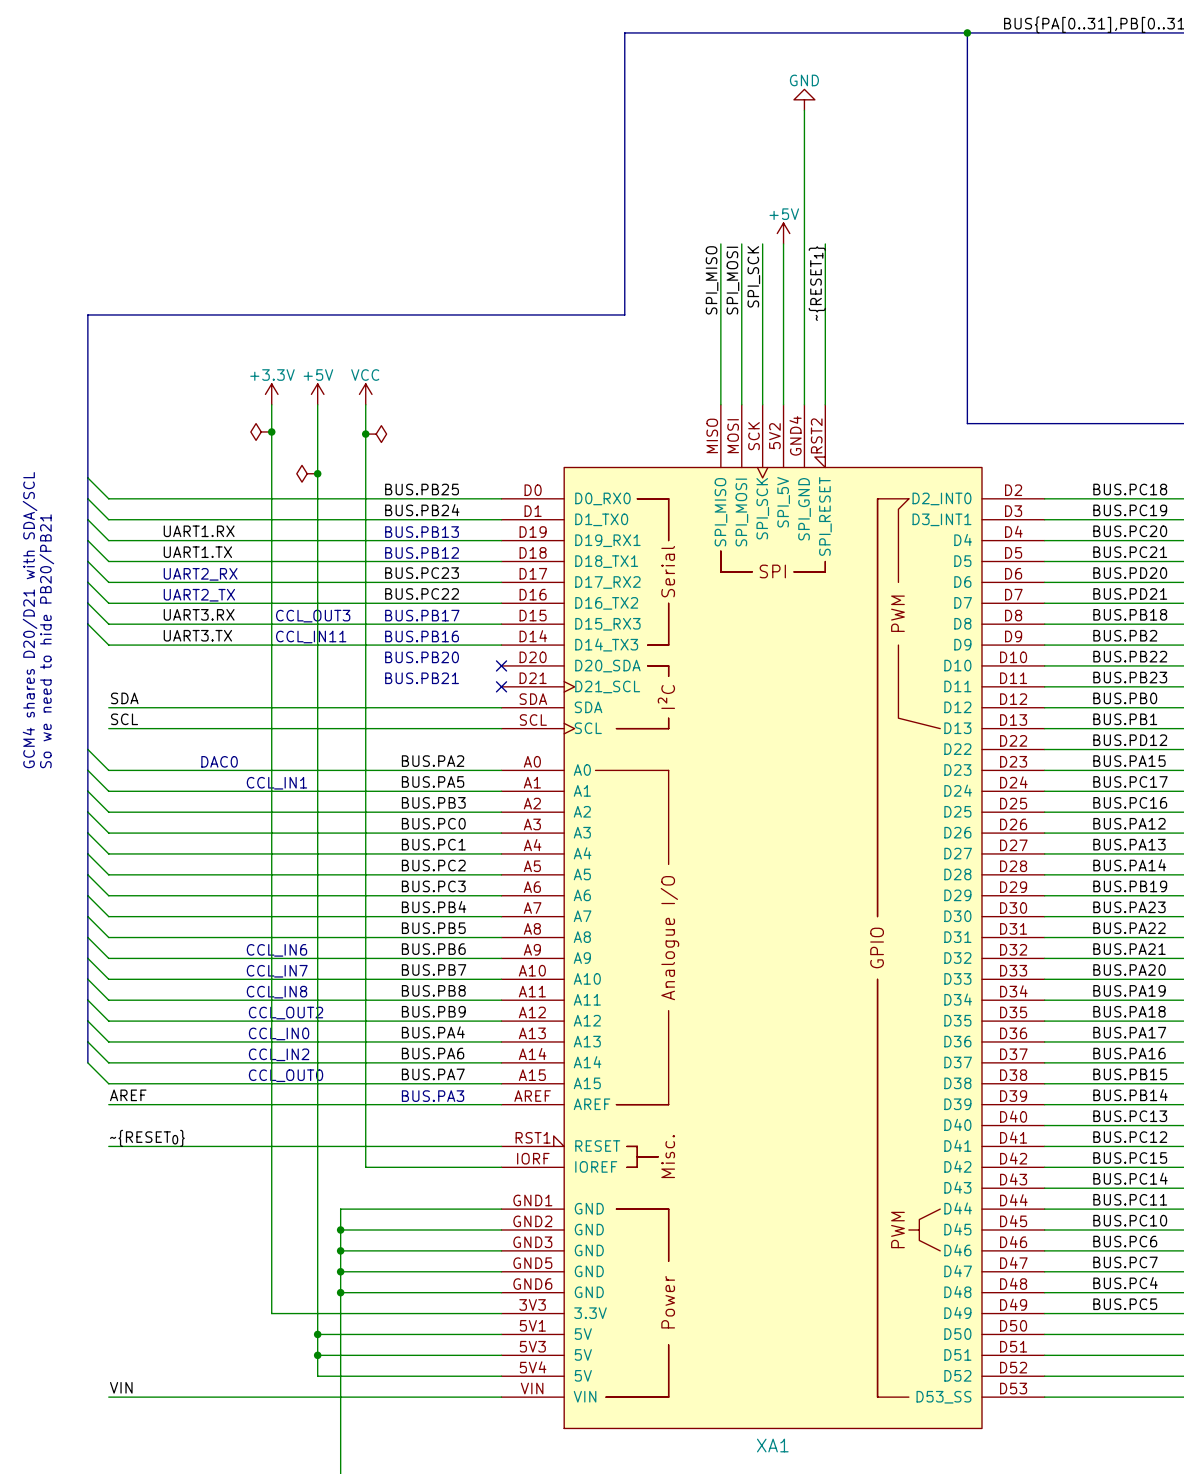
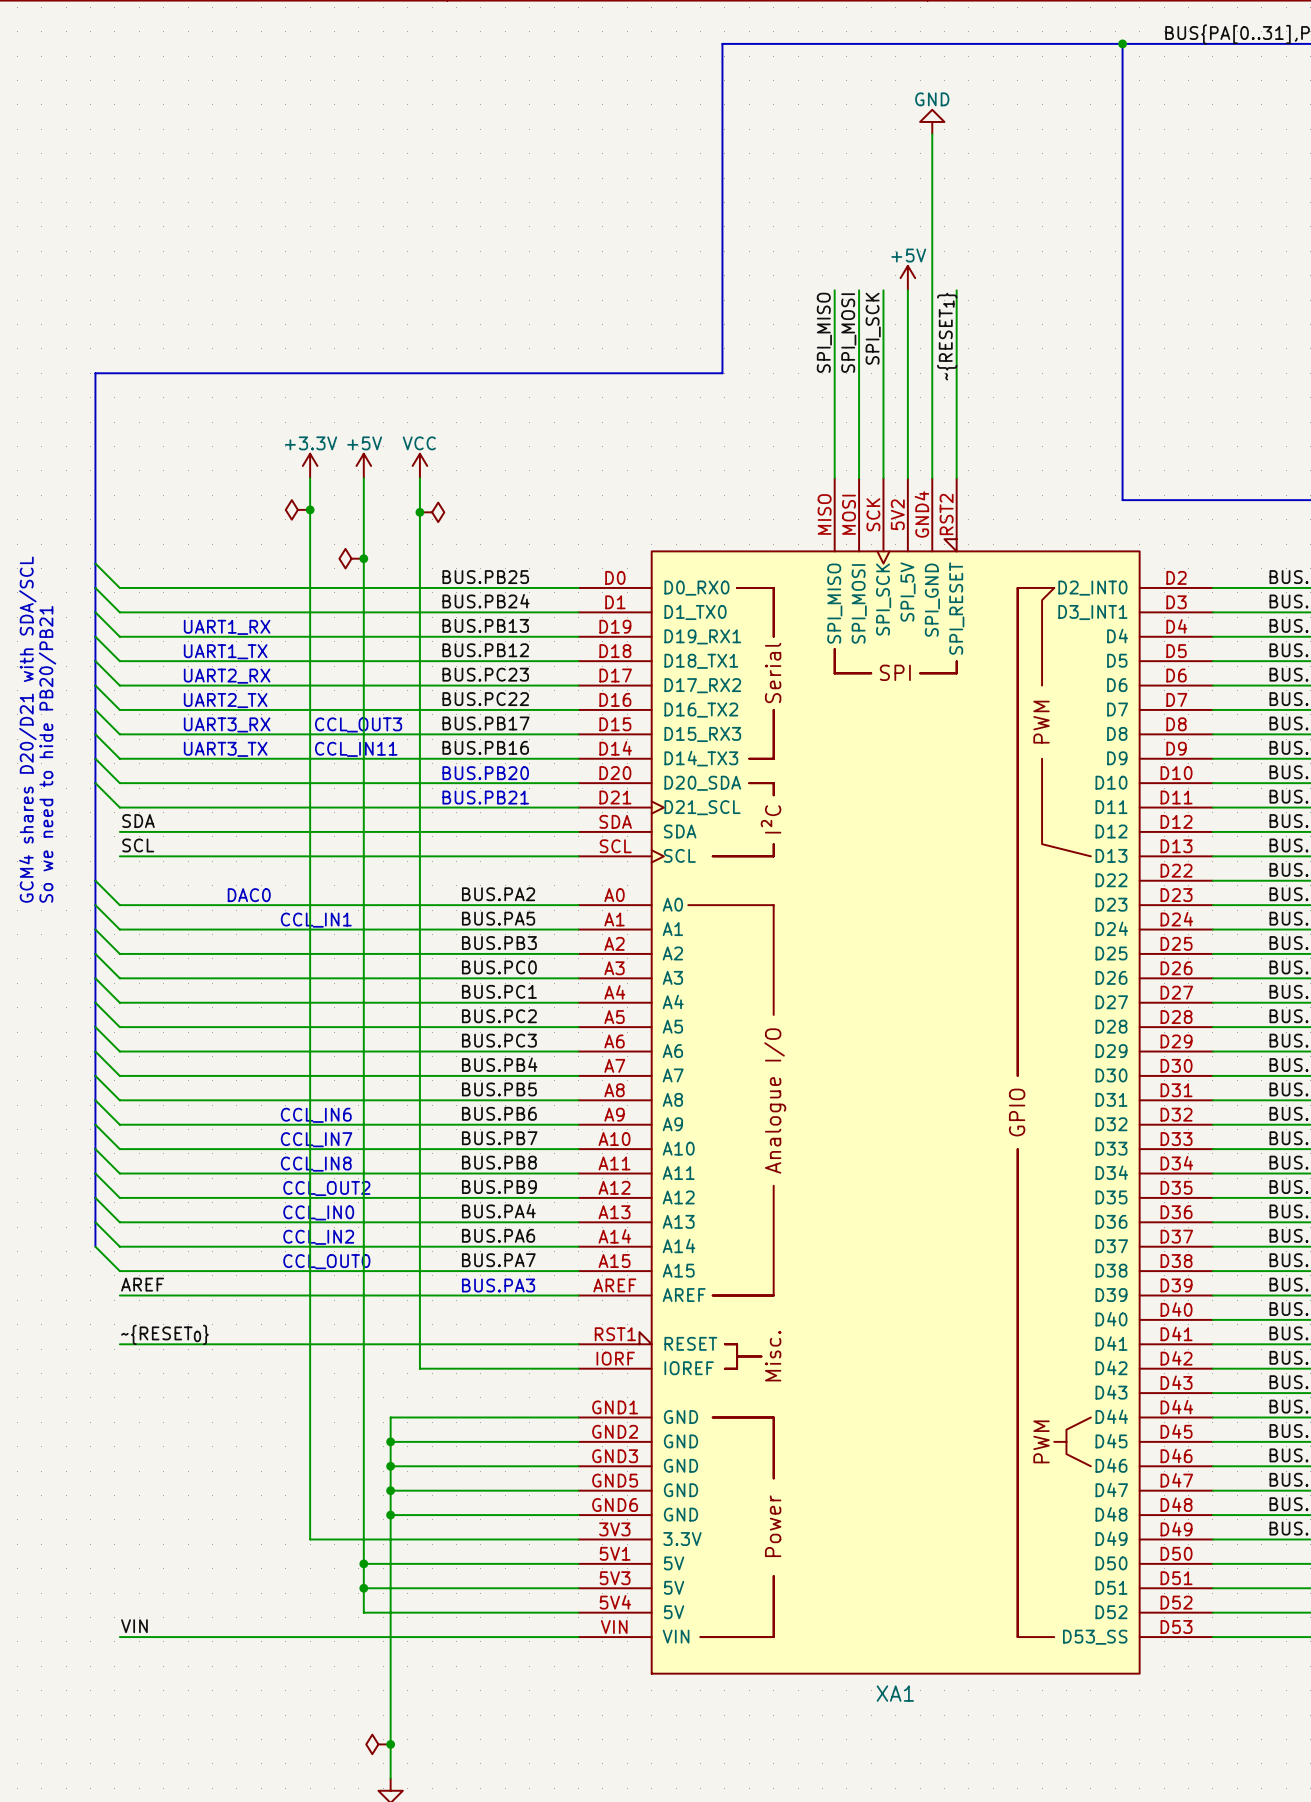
label: UART1.RX (199, 531) -> none
label: none -> BUS.PB13 (485, 625)
text: none -> UART1_RX (227, 627)
text: BUS.PB13 (422, 532) -> none
label: UART1.TX (197, 552) -> none
text: BUS.PB12 (422, 552) -> none
label: none -> BUS.PB12 (485, 650)
text: none -> UART1_TX (225, 651)
label: UART3.RX (199, 614) -> none
label: none -> BUS.PB17 (486, 723)
text: BUS.PB17 (422, 615) -> none
text: none -> UART3_RX (227, 724)
label: UART3.TX (197, 635) -> none
label: none -> BUS.PB16 (485, 747)
text: BUS.PB16 (422, 636) -> none
text: none -> UART3_TX (225, 749)
wire: none -> (95, 758) (119, 783) (578, 783)
wire: none -> (95, 783) (119, 807) (578, 807)
no-connect mark: (501, 665) -> none
no-connect mark: (501, 686) -> none

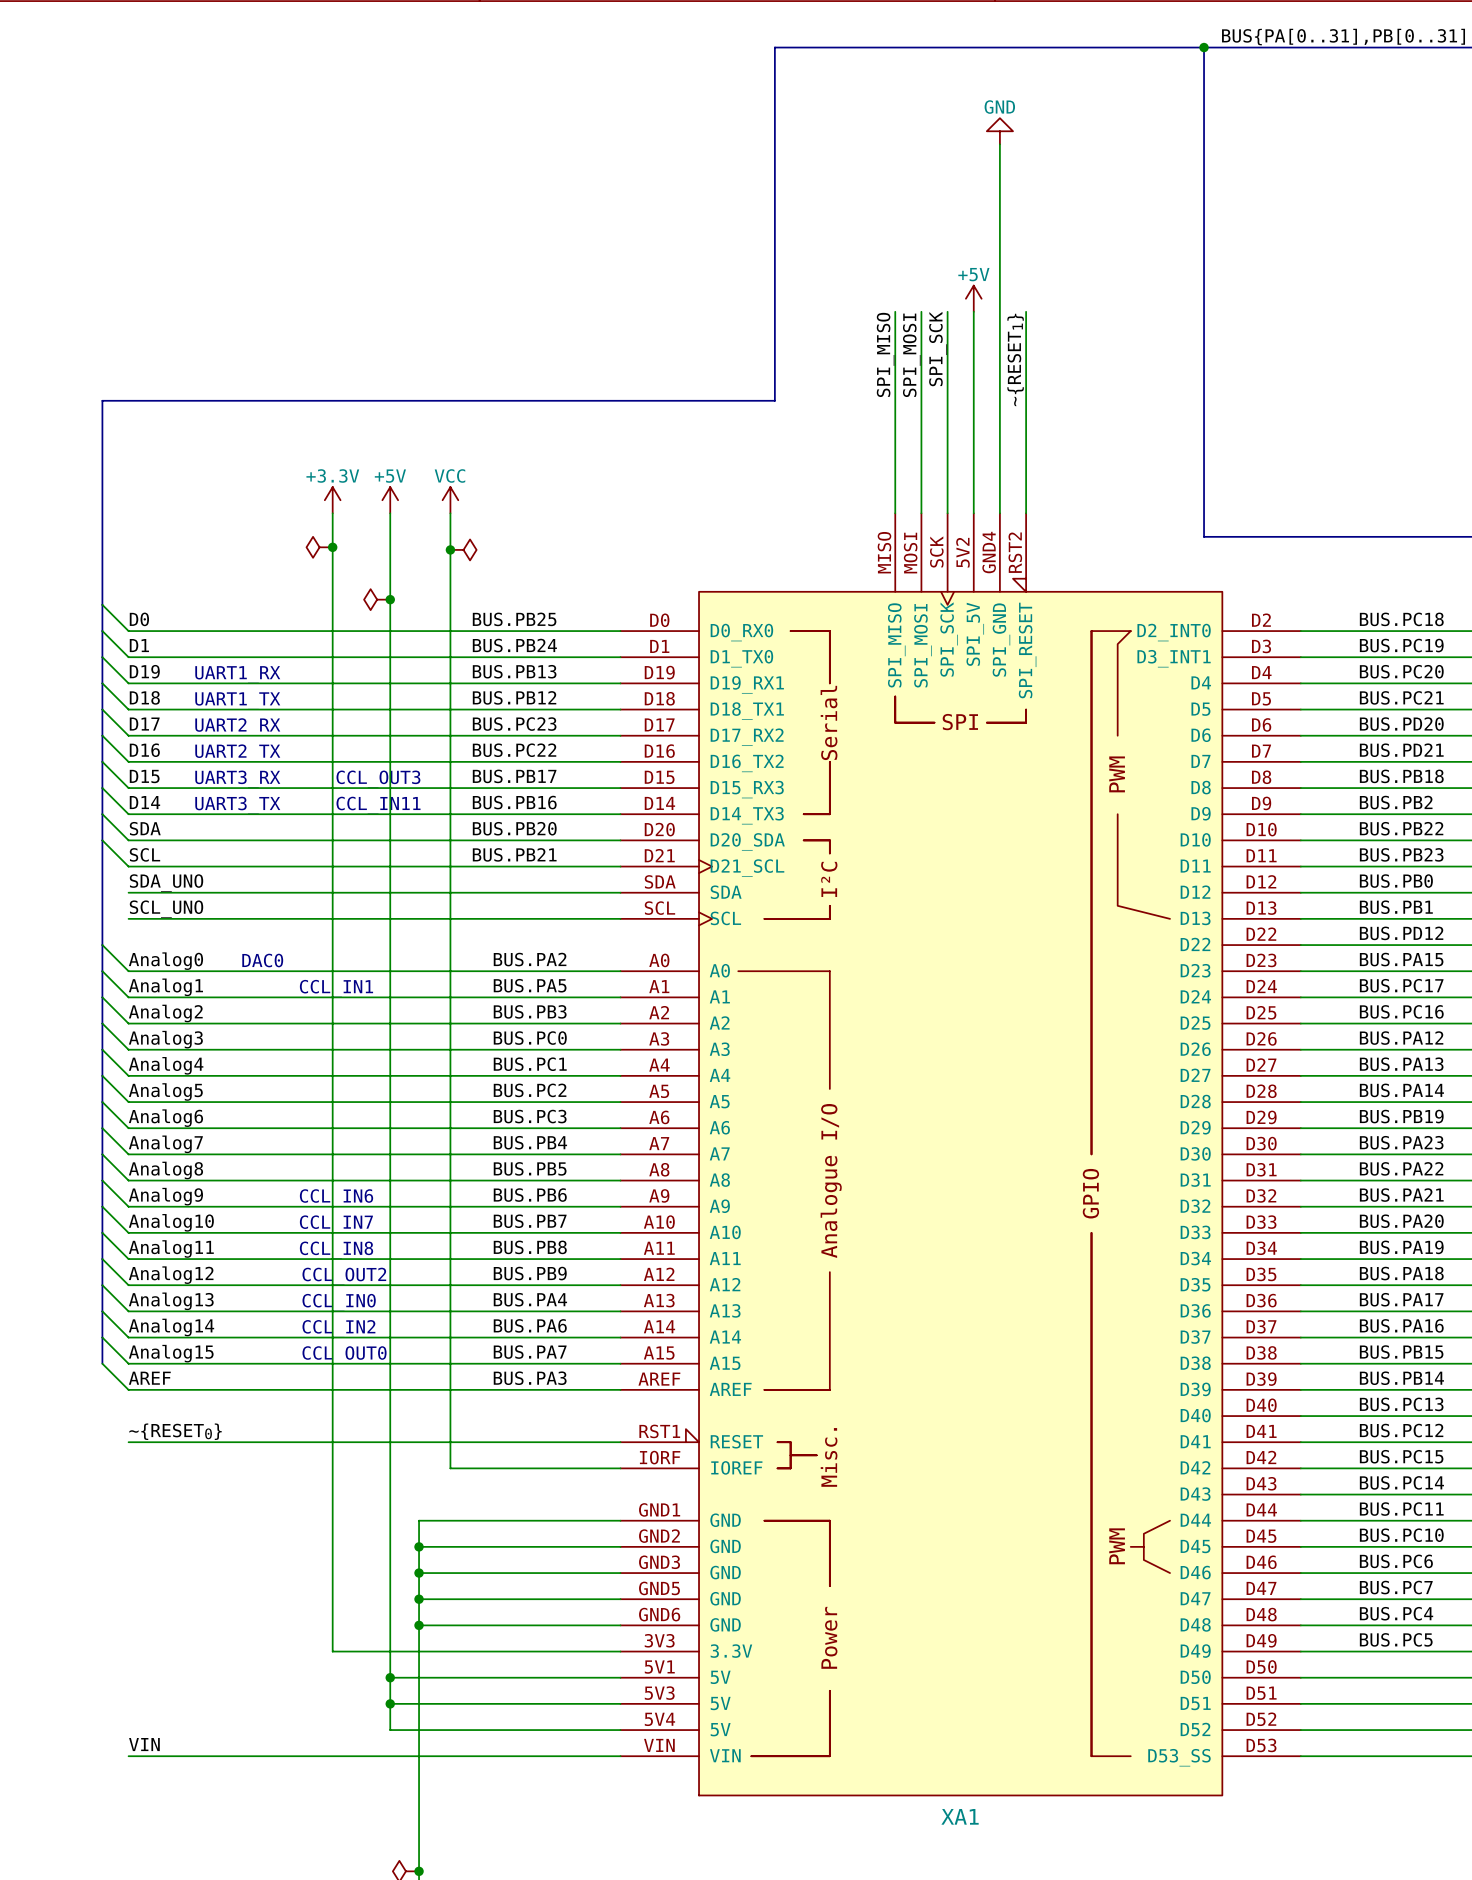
label: none -> D0 (139, 619)
label: none -> D1 (139, 645)
label: none -> D19 (144, 671)
label: none -> D18 (144, 697)
label: none -> D17 (144, 724)
label: none -> D16 (144, 750)
label: none -> D15 (144, 776)
text: GCM4 shares D20/D21 with SDA/SCL (27, 729) -> none
label: none -> D14 (144, 802)
text: So we need to hide PB20/PB21 (47, 754) -> none
label: none -> SDA (145, 828)
label: none -> BUS.PB20 (514, 828)
text: BUS.PB20 (485, 773) -> none
label: none -> SCL (144, 854)
label: none -> BUS.PB21 (514, 854)
text: BUS.PB21 (485, 797) -> none
label: SDA (138, 821) -> SDA_UNO (166, 883)
label: SCL (138, 845) -> SCL_UNO (166, 909)
label: none -> Analog0 (165, 961)
label: none -> Analog1 (165, 987)
label: none -> Analog2 (165, 1013)
label: none -> Analog3 (165, 1039)
label: none -> Analog4 (166, 1065)
label: none -> Analog5 (165, 1091)
label: none -> Analog6 (165, 1118)
label: none -> Analog7 (165, 1144)
label: none -> Analog8 (165, 1170)
label: none -> Analog9 (165, 1196)
label: none -> Analog10 (171, 1222)
label: none -> Analog11 (171, 1248)
label: none -> Analog12 (171, 1275)
label: none -> Analog13 (171, 1301)
label: none -> Analog14 (171, 1327)
bus: none -> (102, 1337) (102, 1363)
label: none -> Analog15 (171, 1353)
wire: none -> (102, 1363) (128, 1389)
label: none -> BUS.PA3 (530, 1378)
text: BUS.PA3 (498, 1285) -> none

